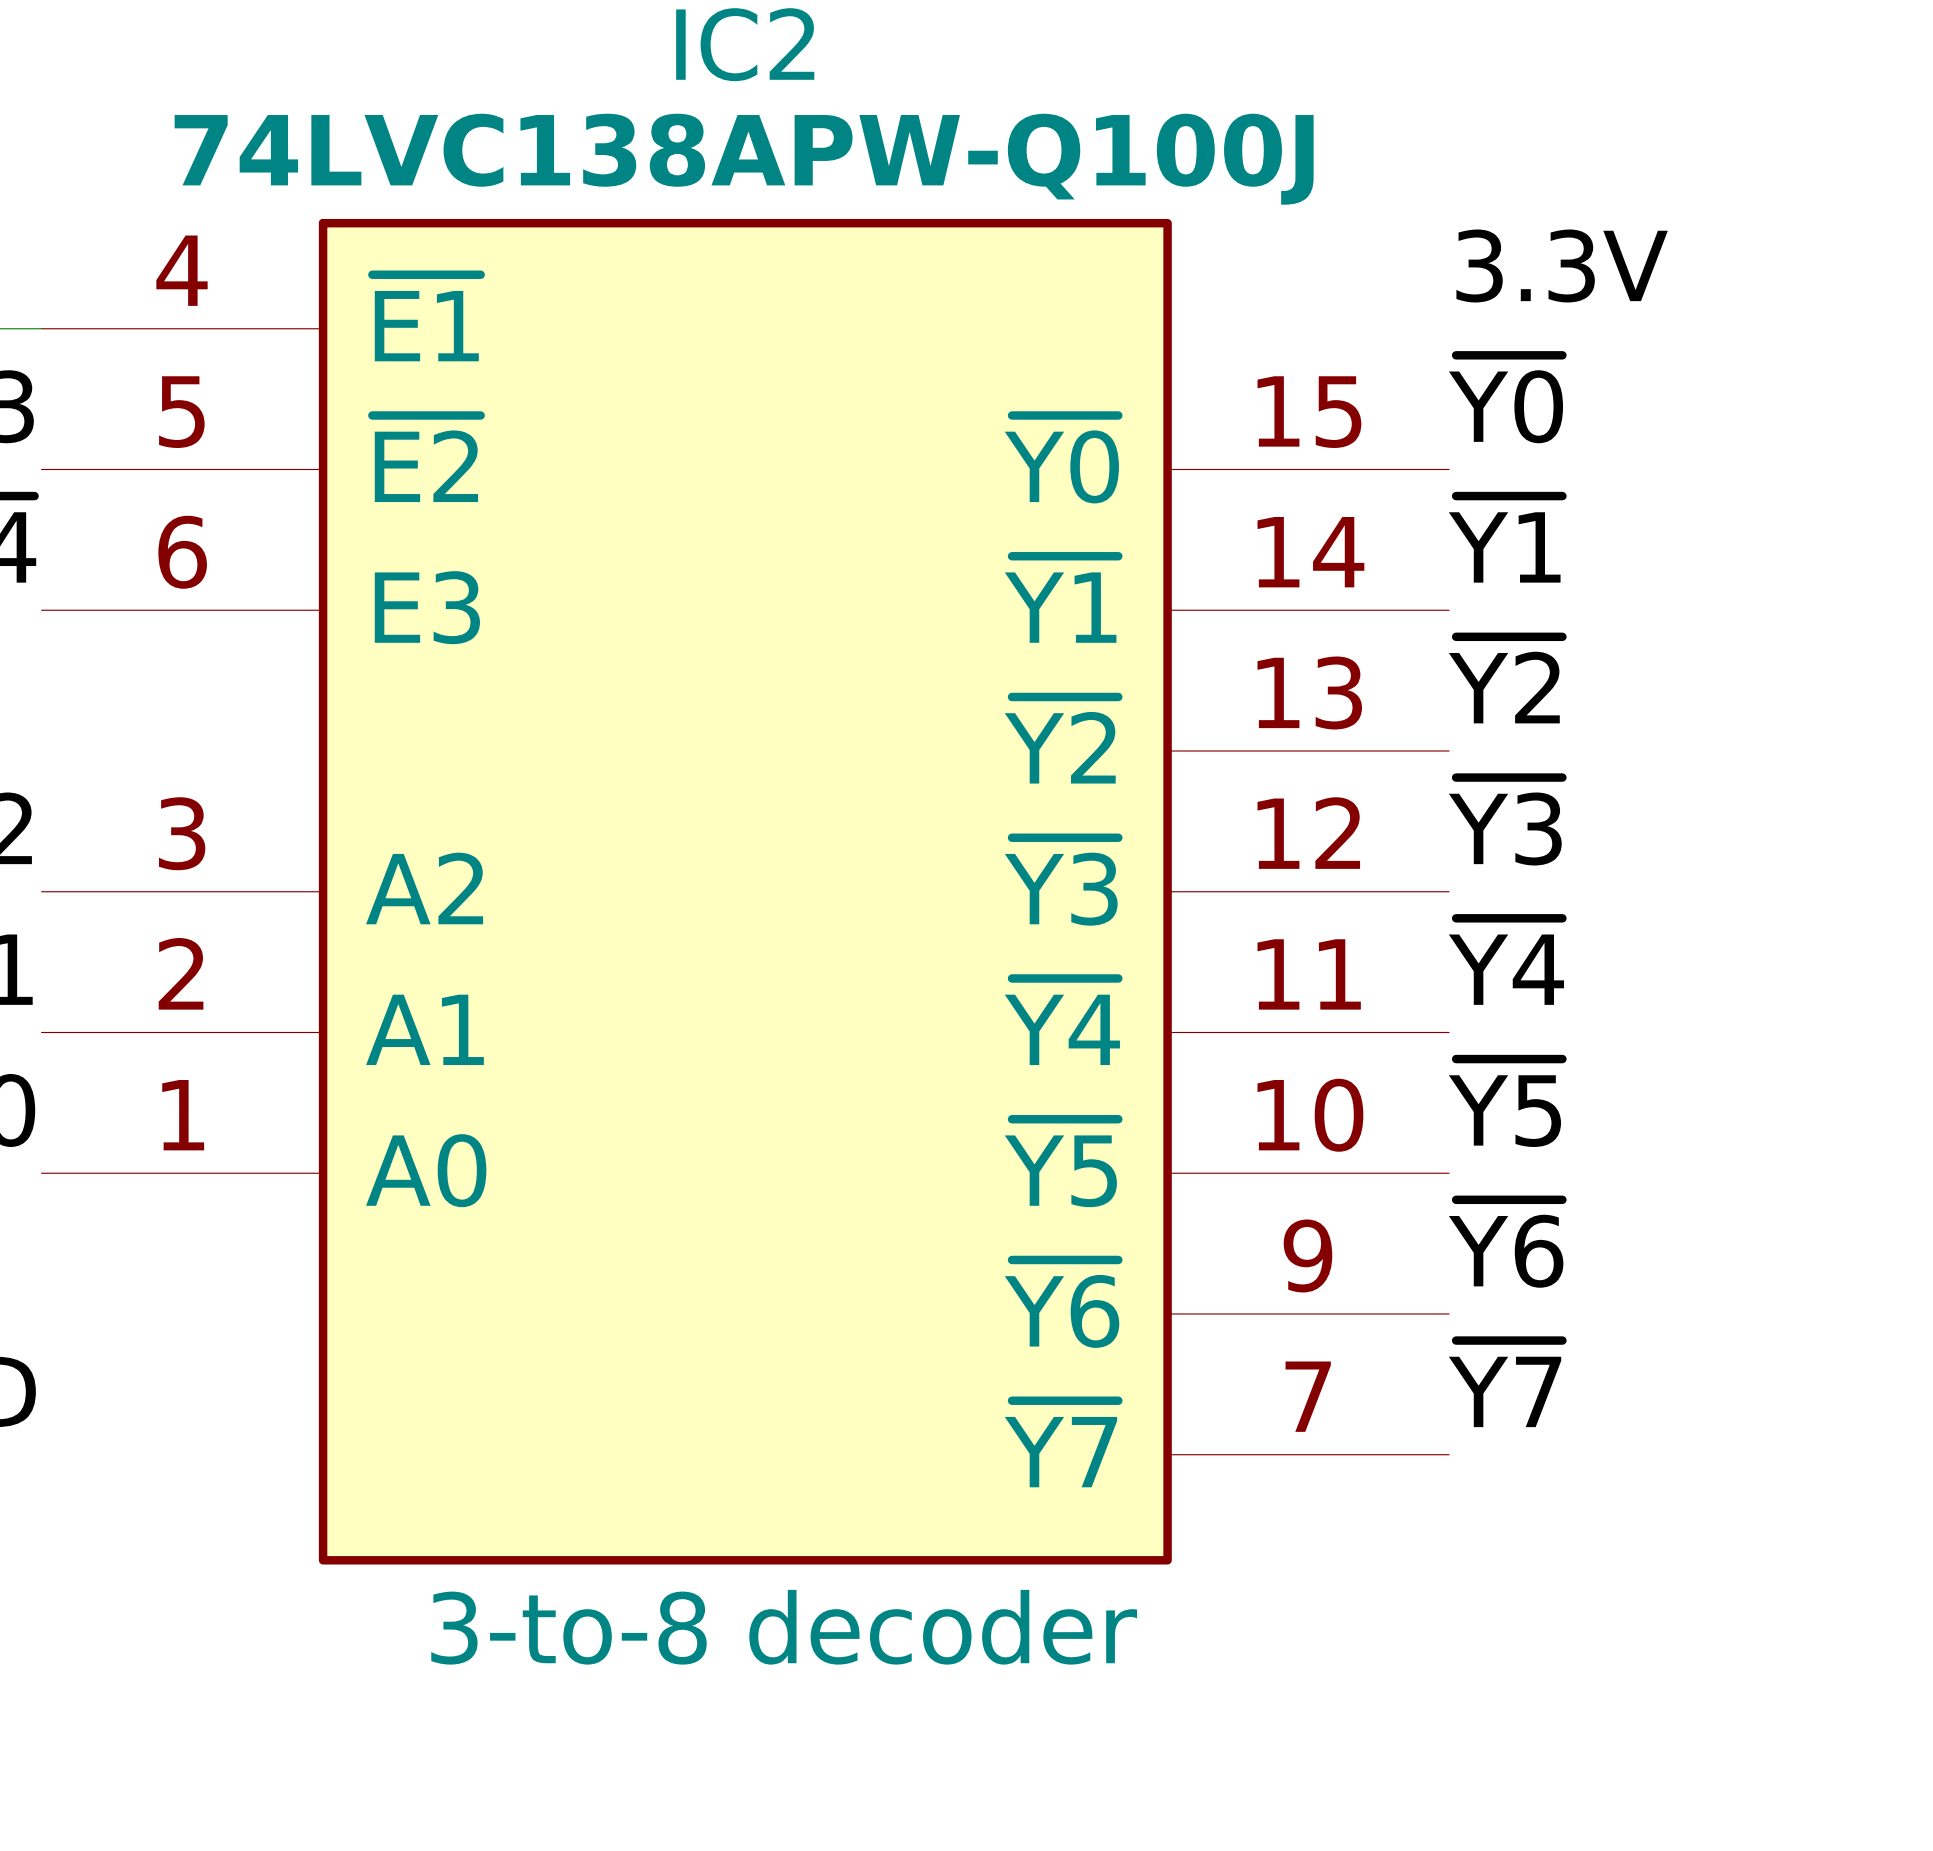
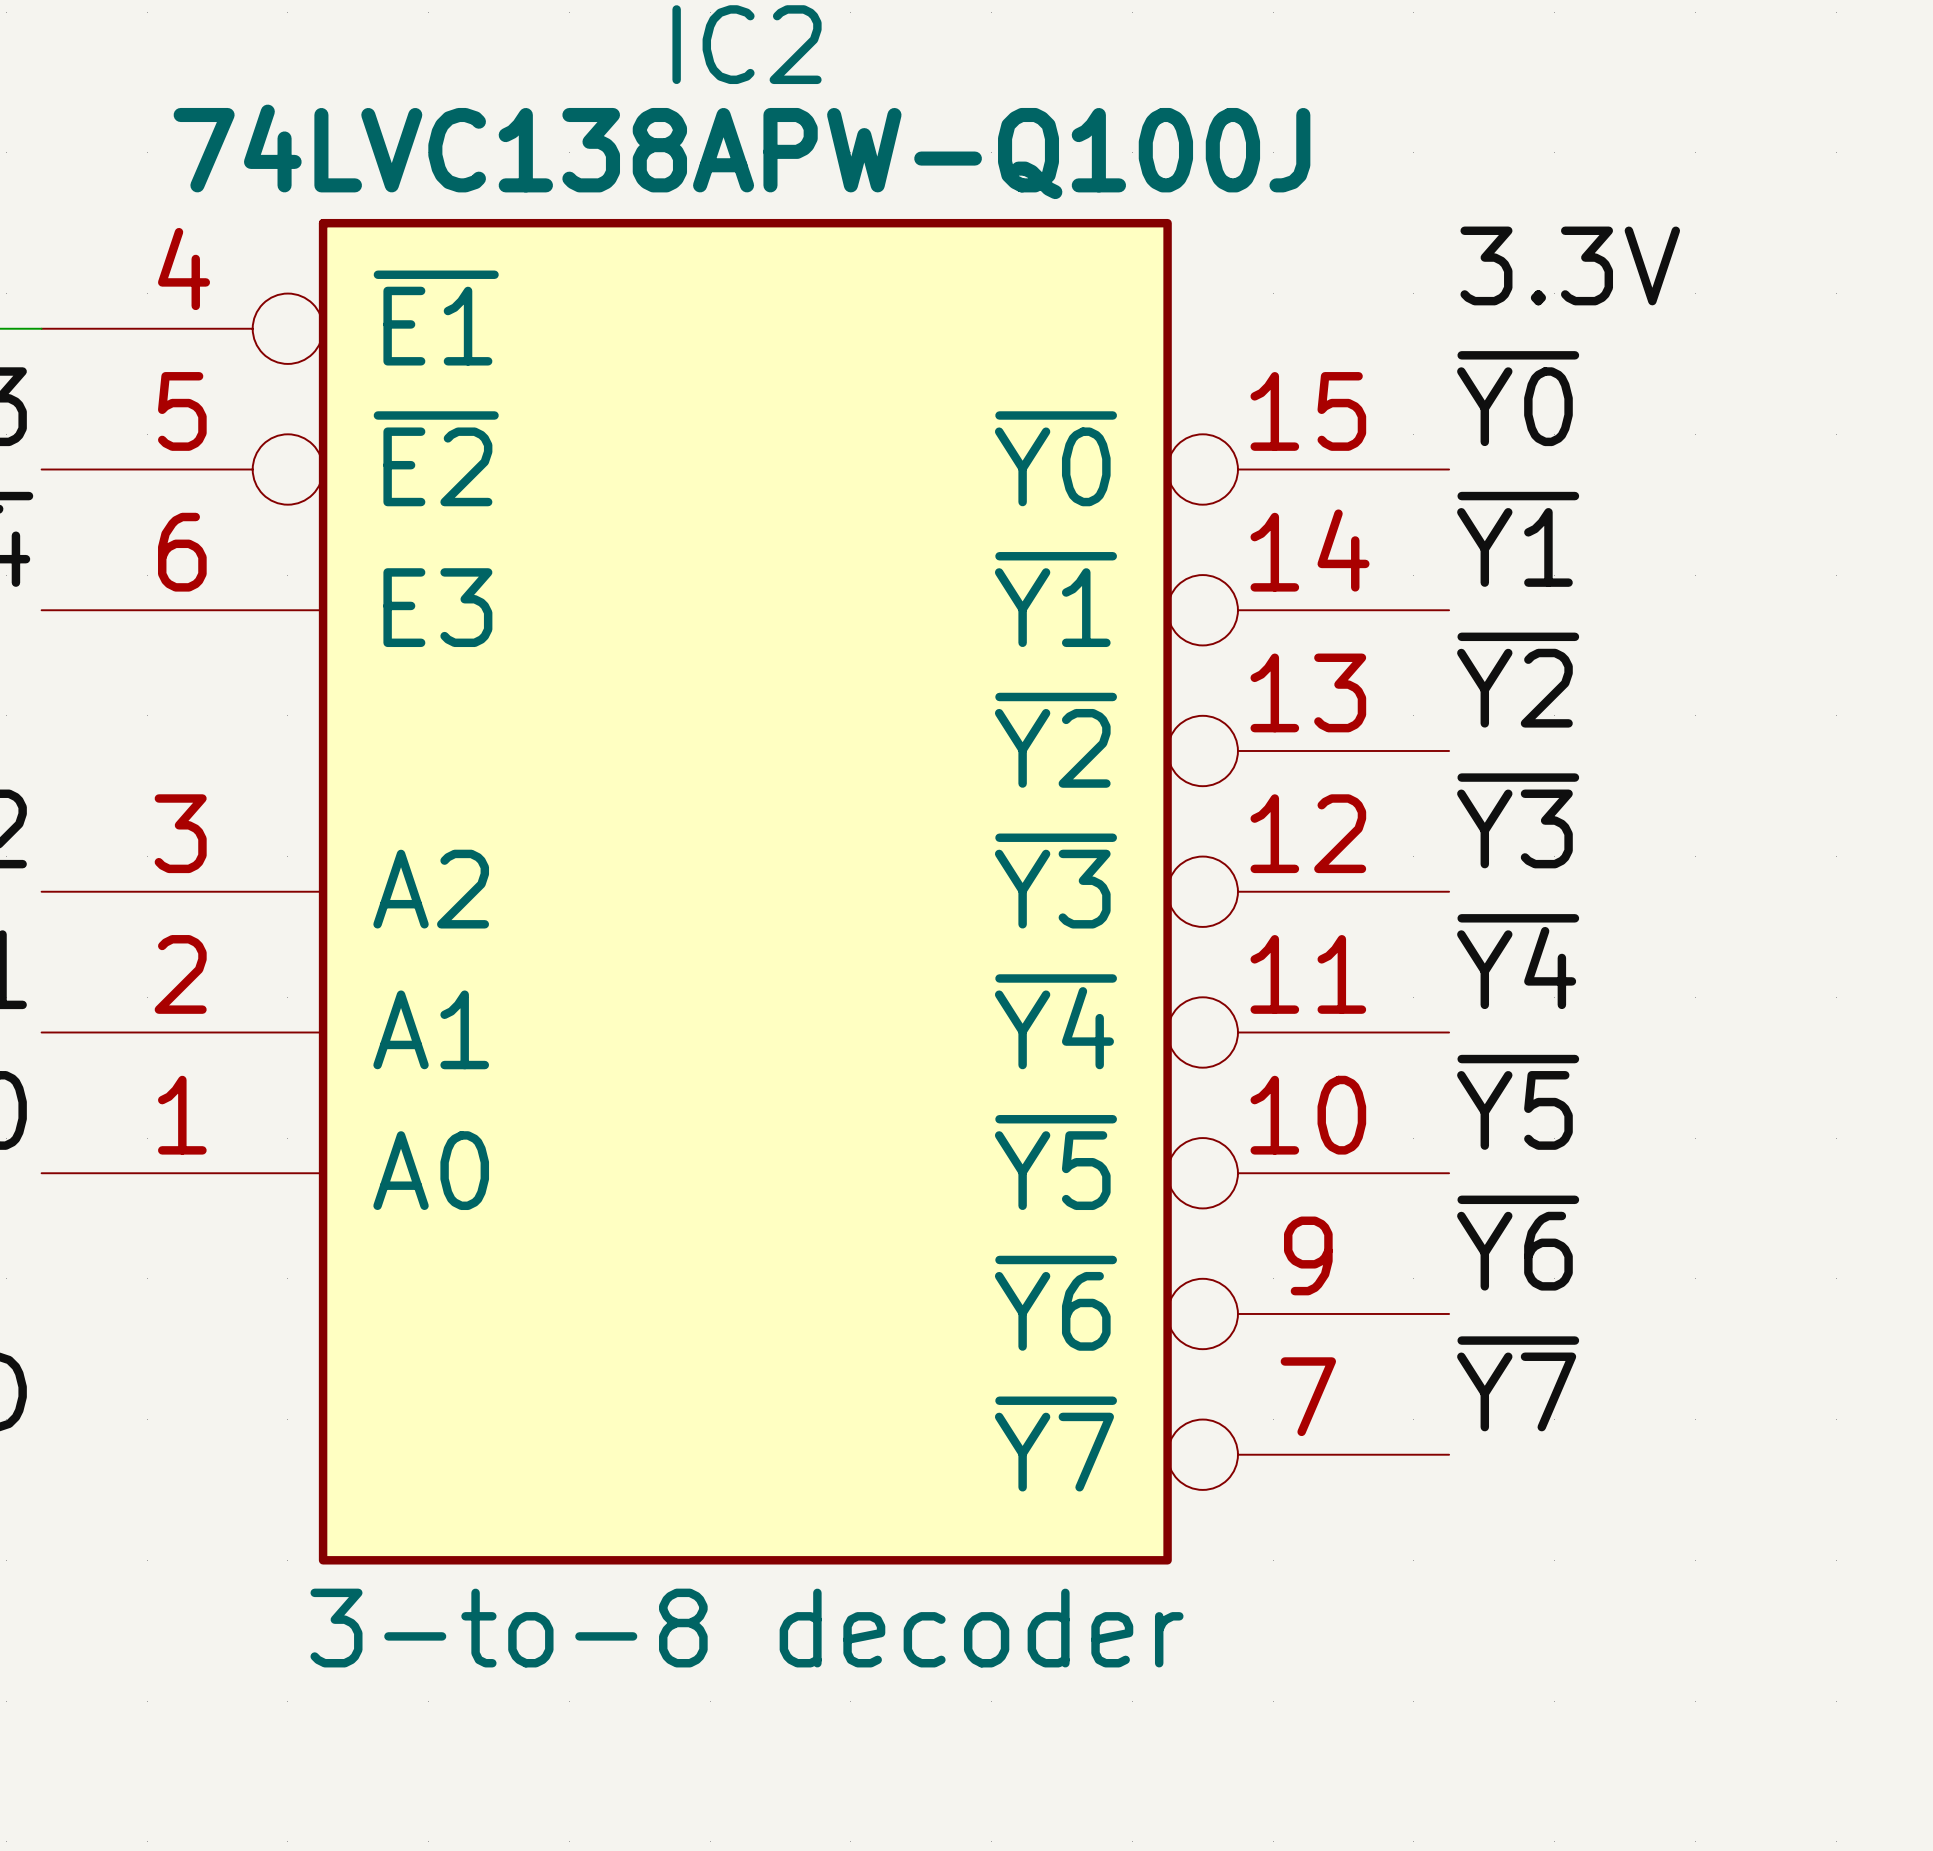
IC2 symbol: [41, 218, 1450, 1565] -> [41, 218, 1450, 1565]
IC2 text position: 3-to-8 decoder (784, 1627) -> 3-to-8 decoder (747, 1628)

